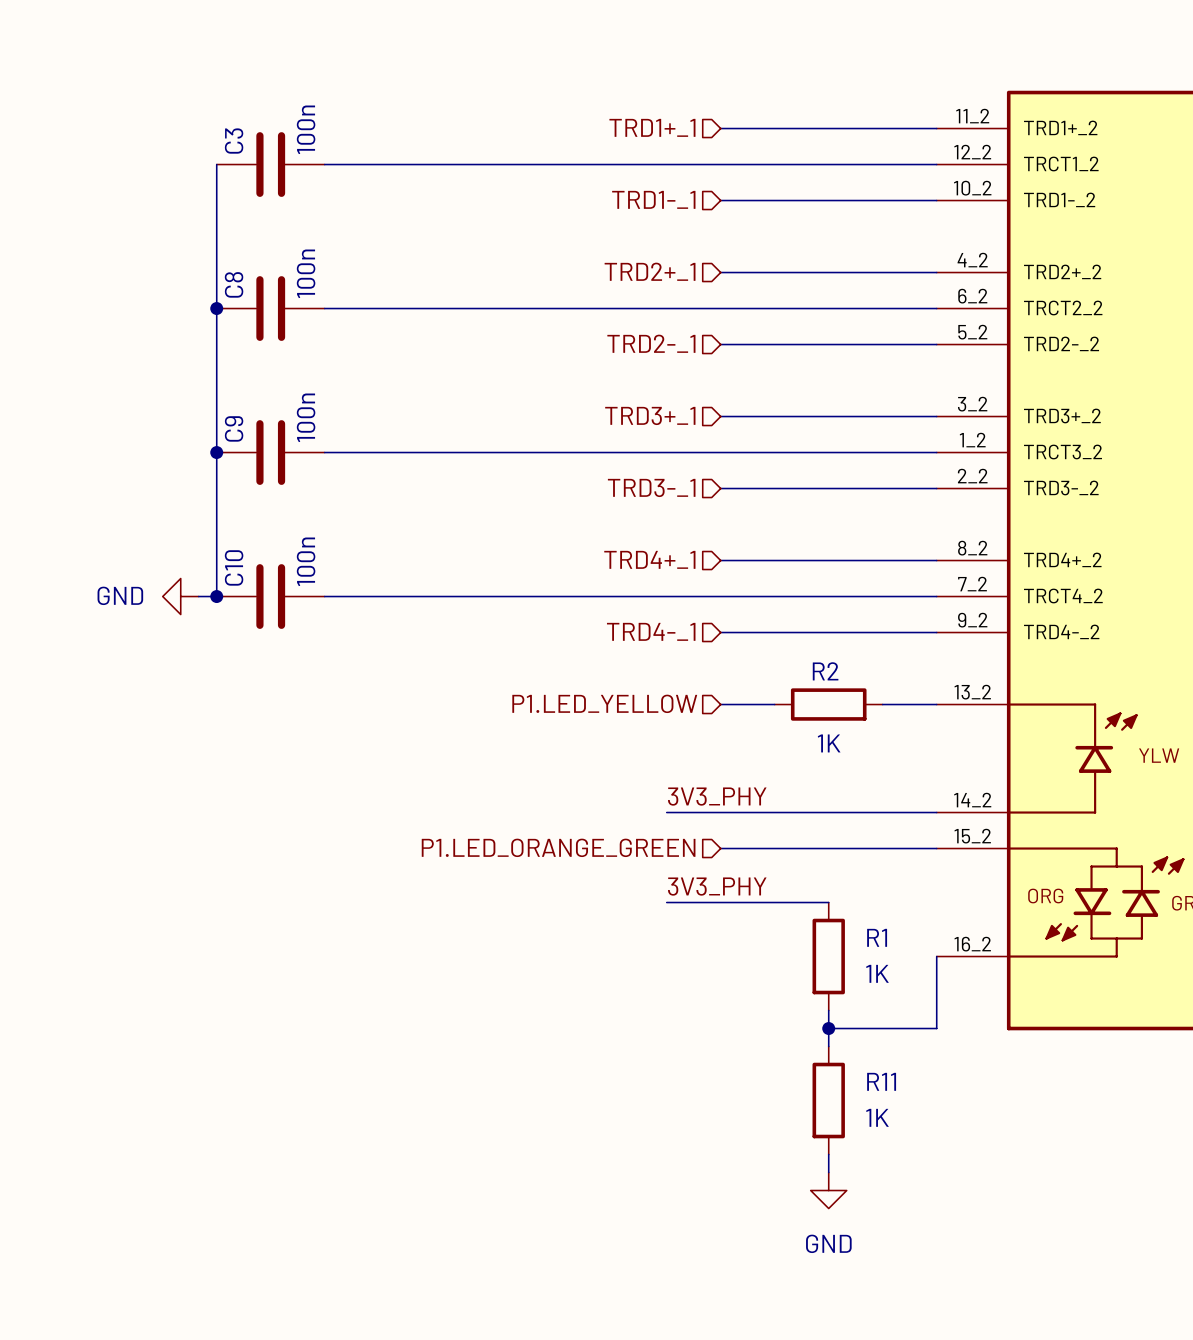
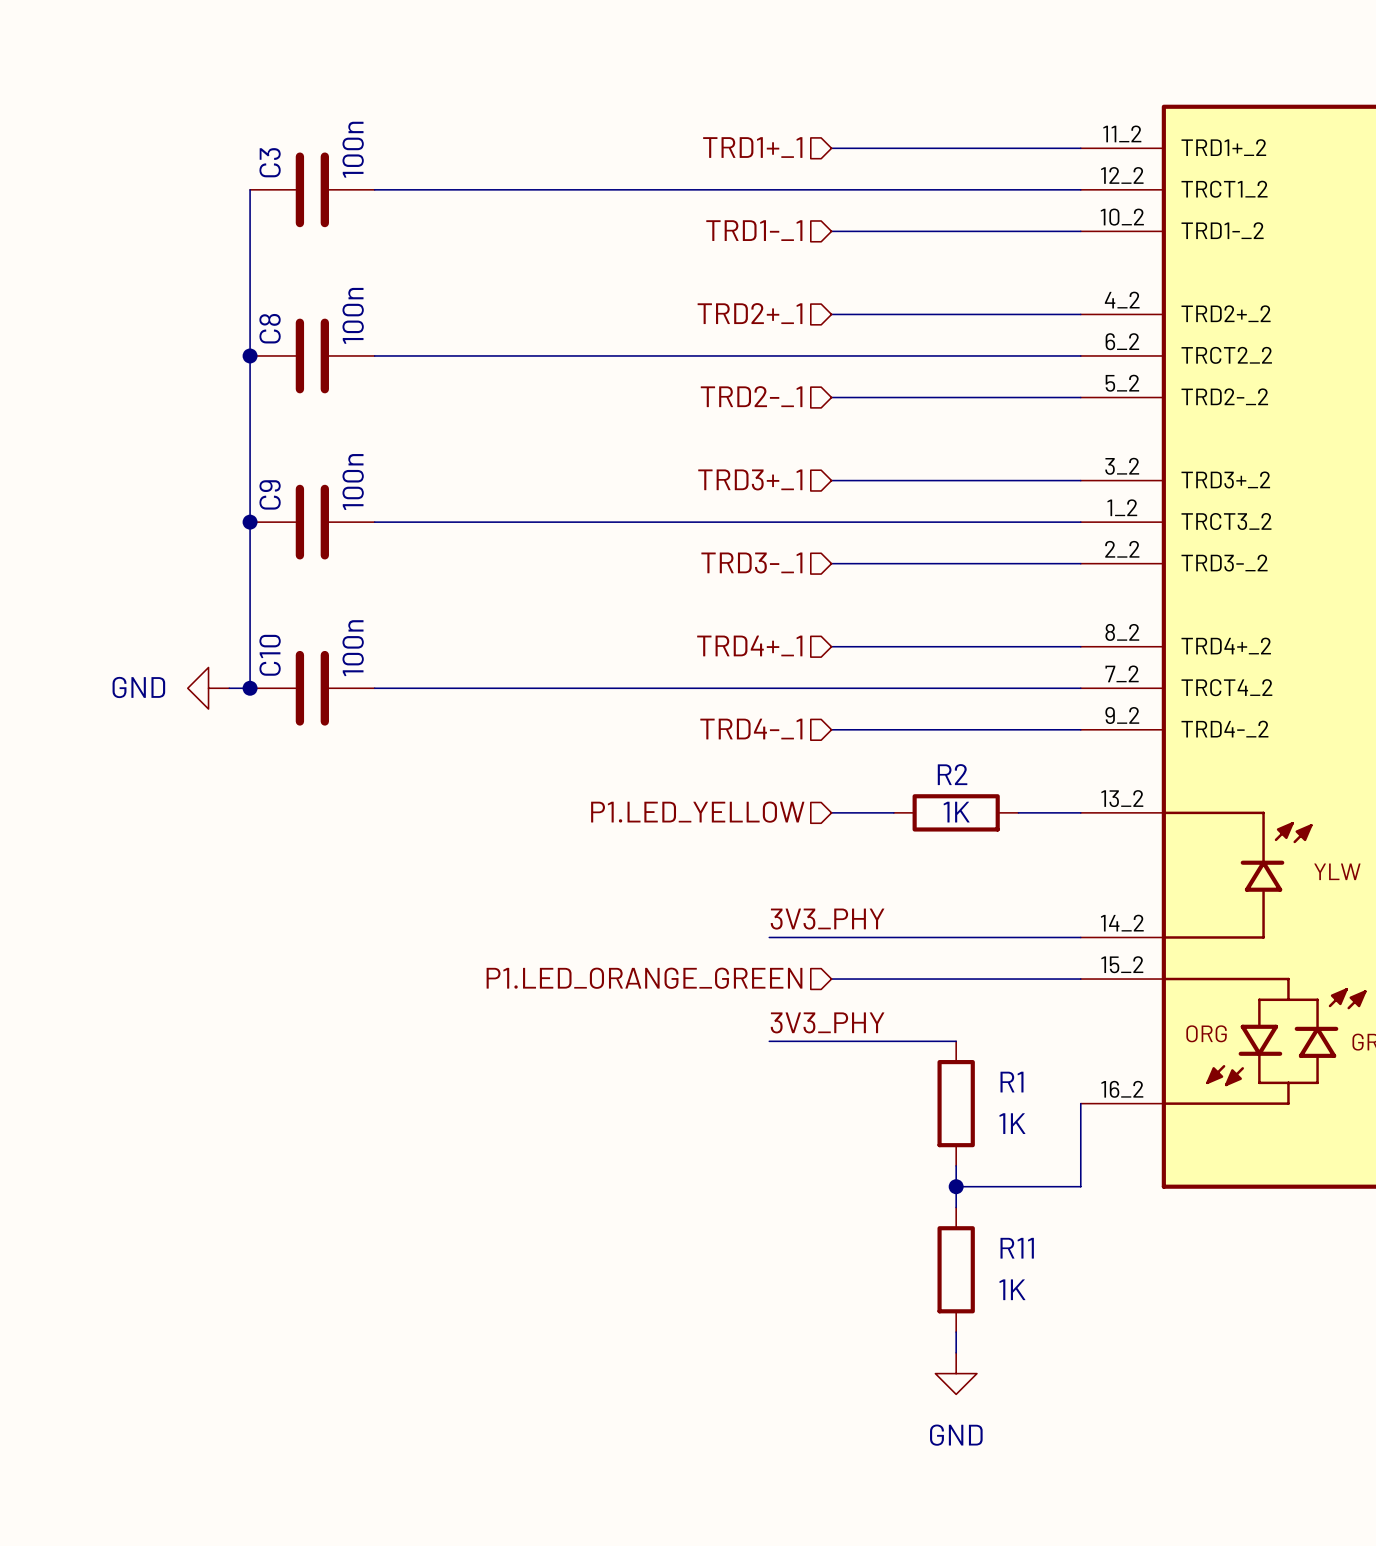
R2 value position: 1K (829, 743) -> 1K (956, 812)

